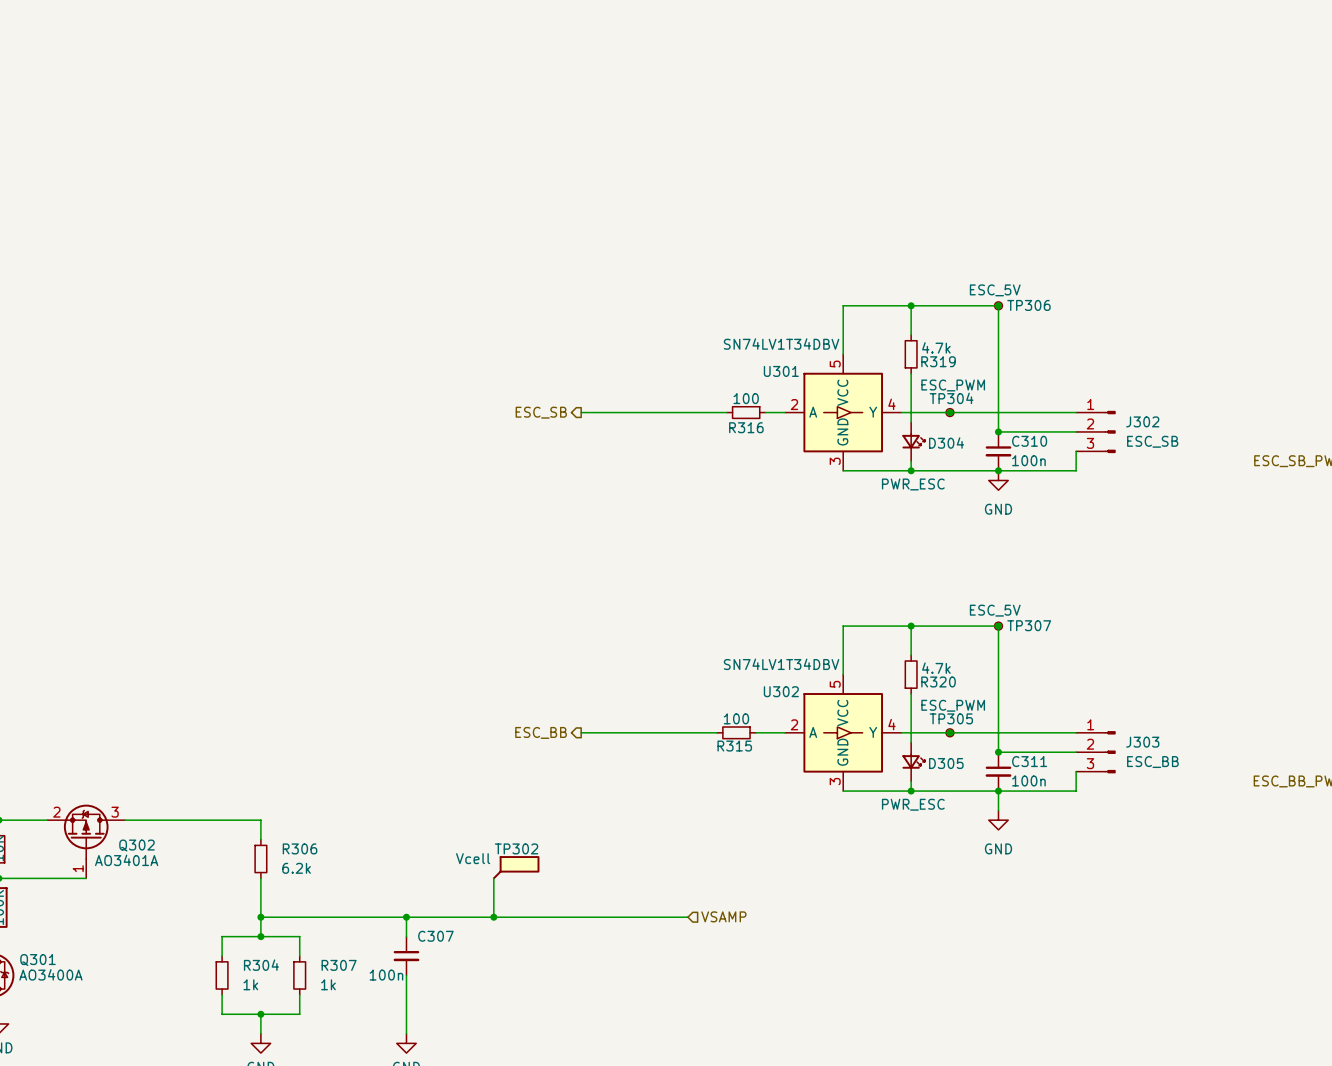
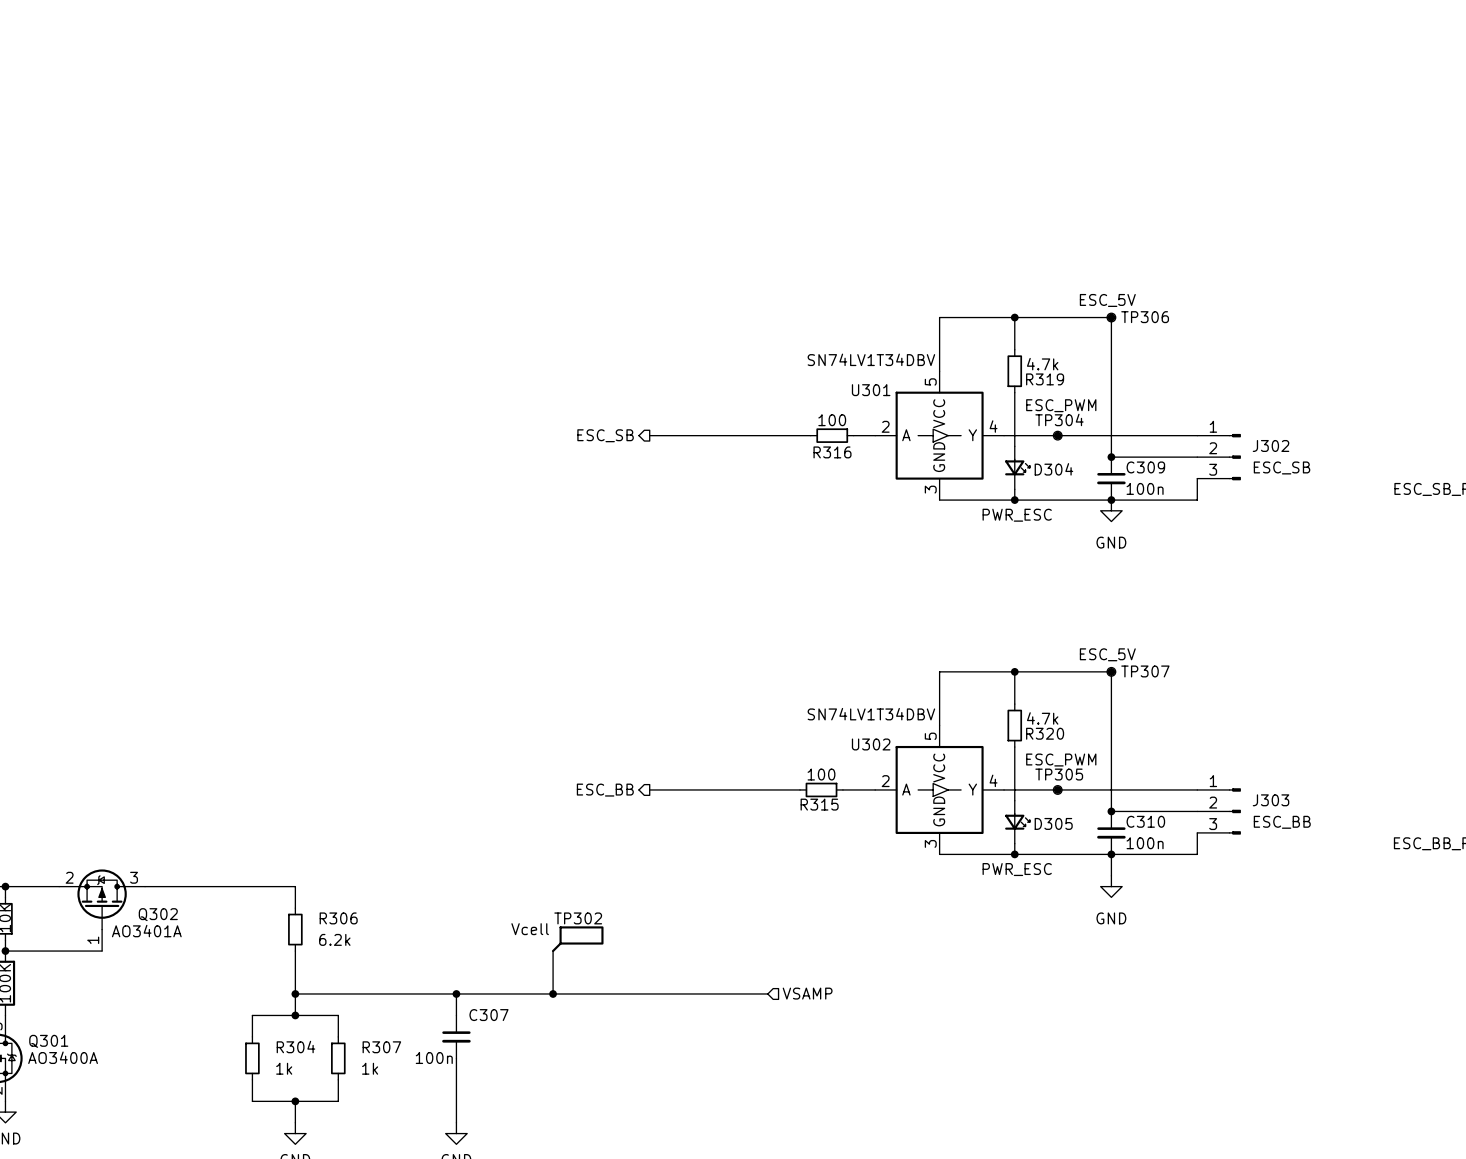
C310 name: C310 (1029, 441) -> C309 (1145, 467)
C311 name: C311 (1029, 761) -> C310 (1145, 821)

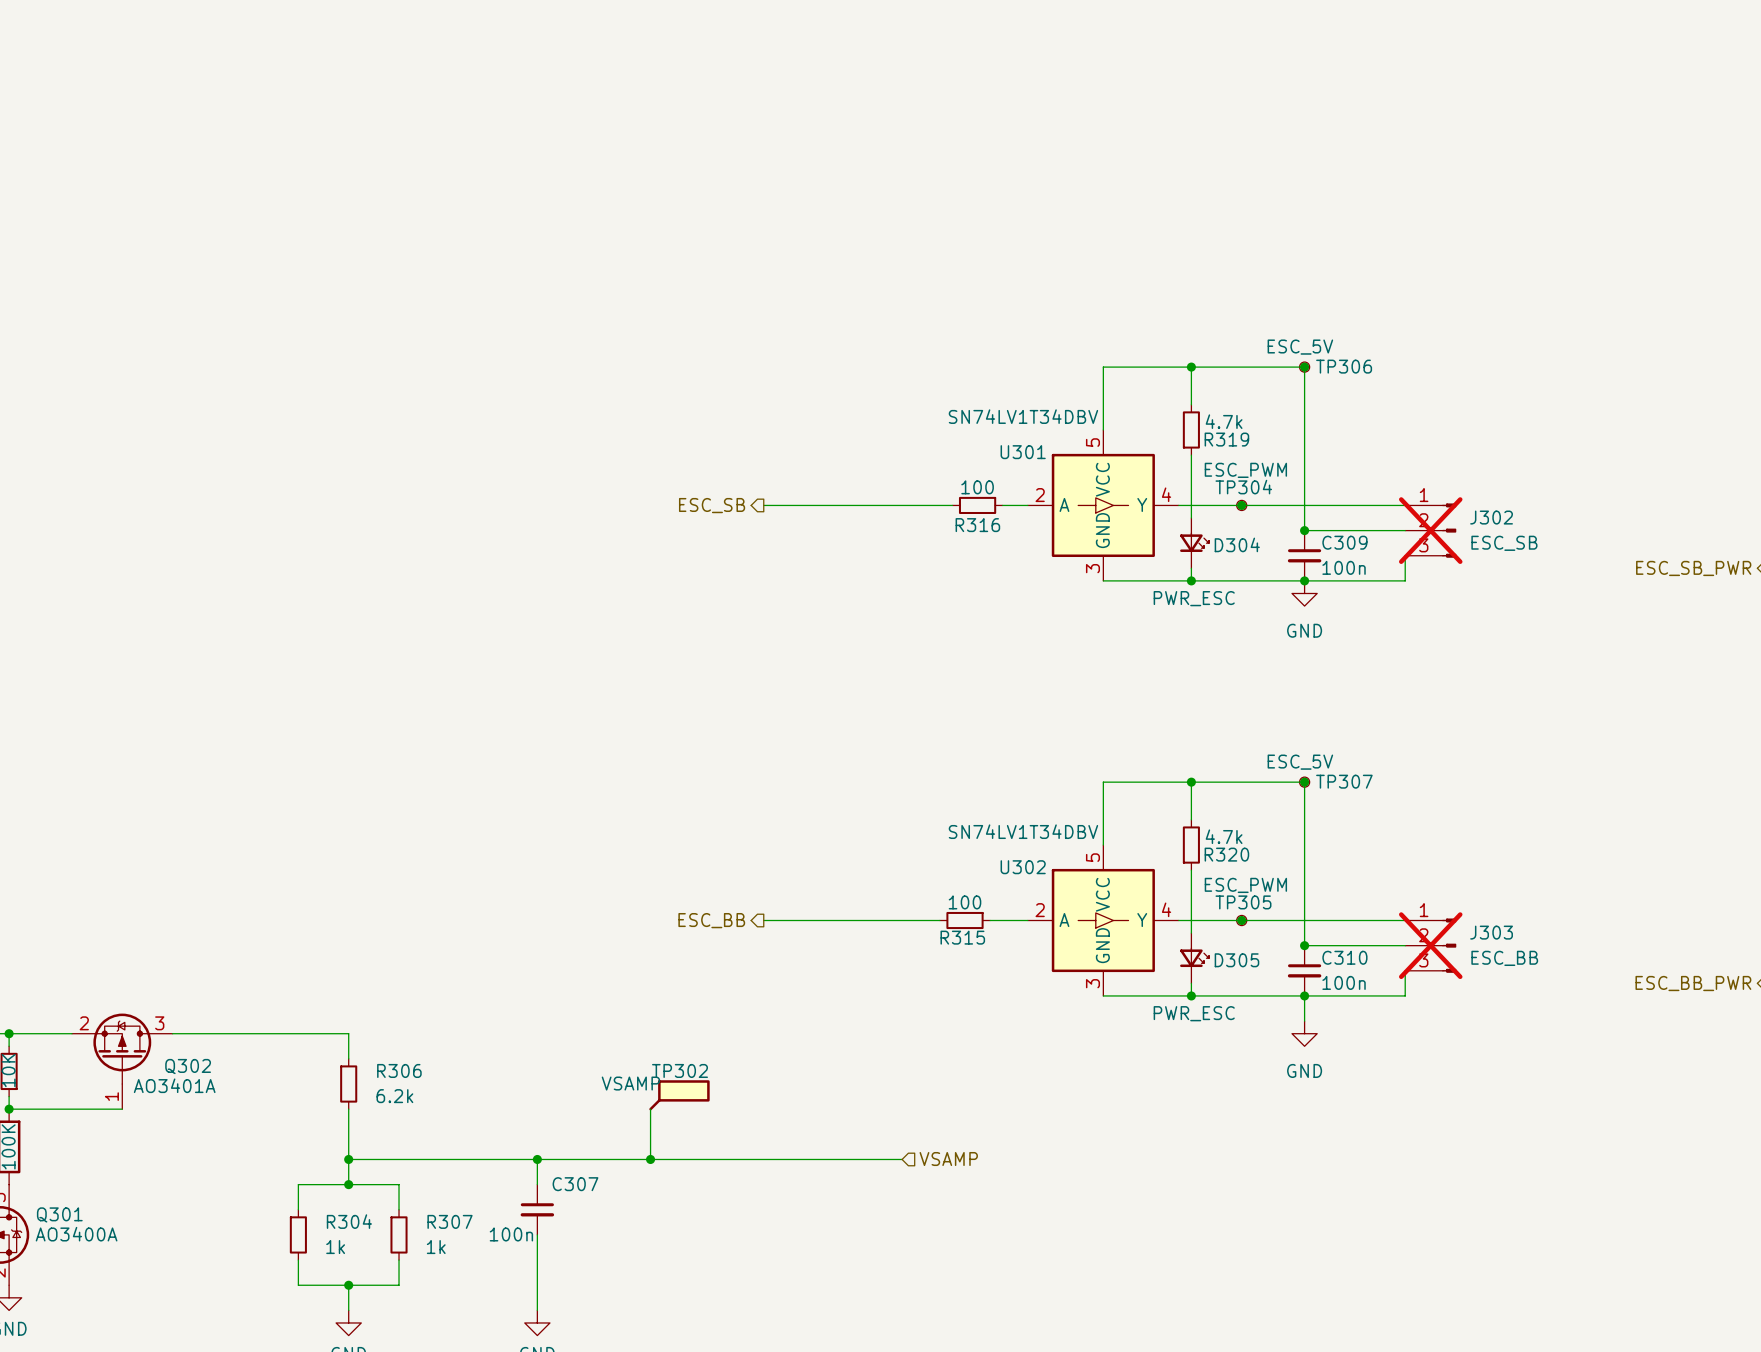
J302 do-not-place cross: none -> (1430, 530)
J303 do-not-place cross: none -> (1430, 945)
TP302 value: Vcell (530, 929) -> VSAMP (630, 1083)

